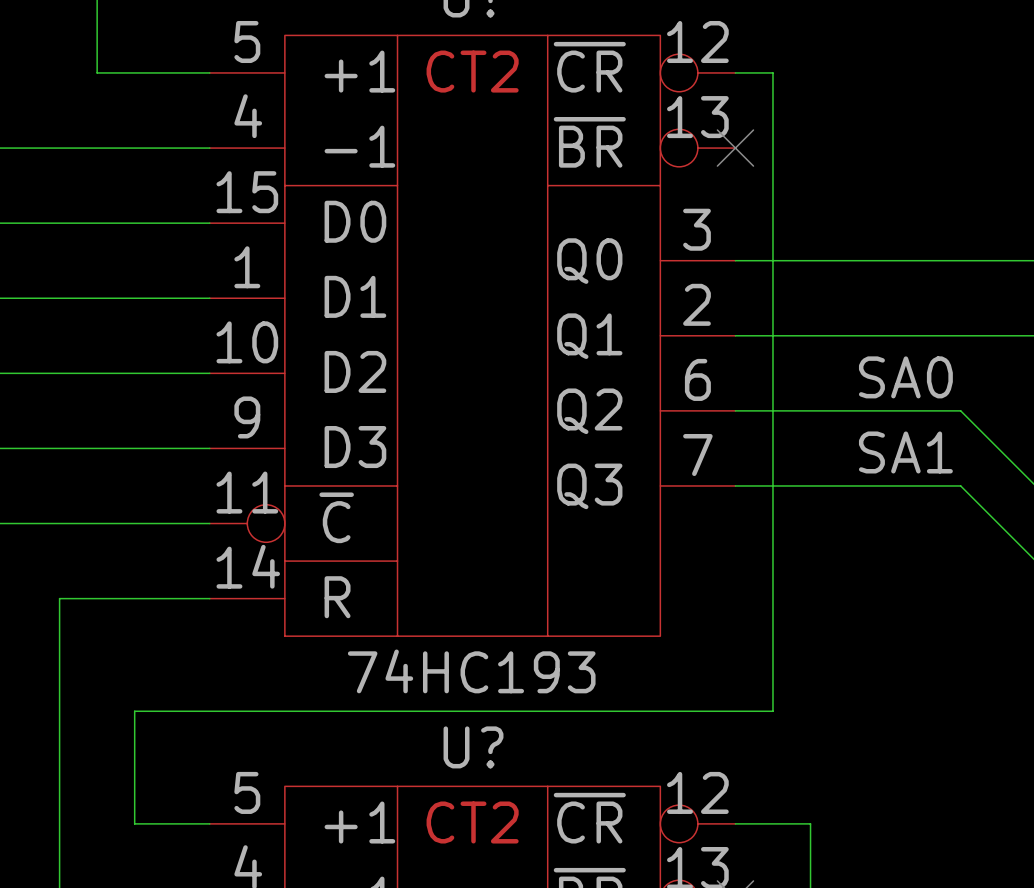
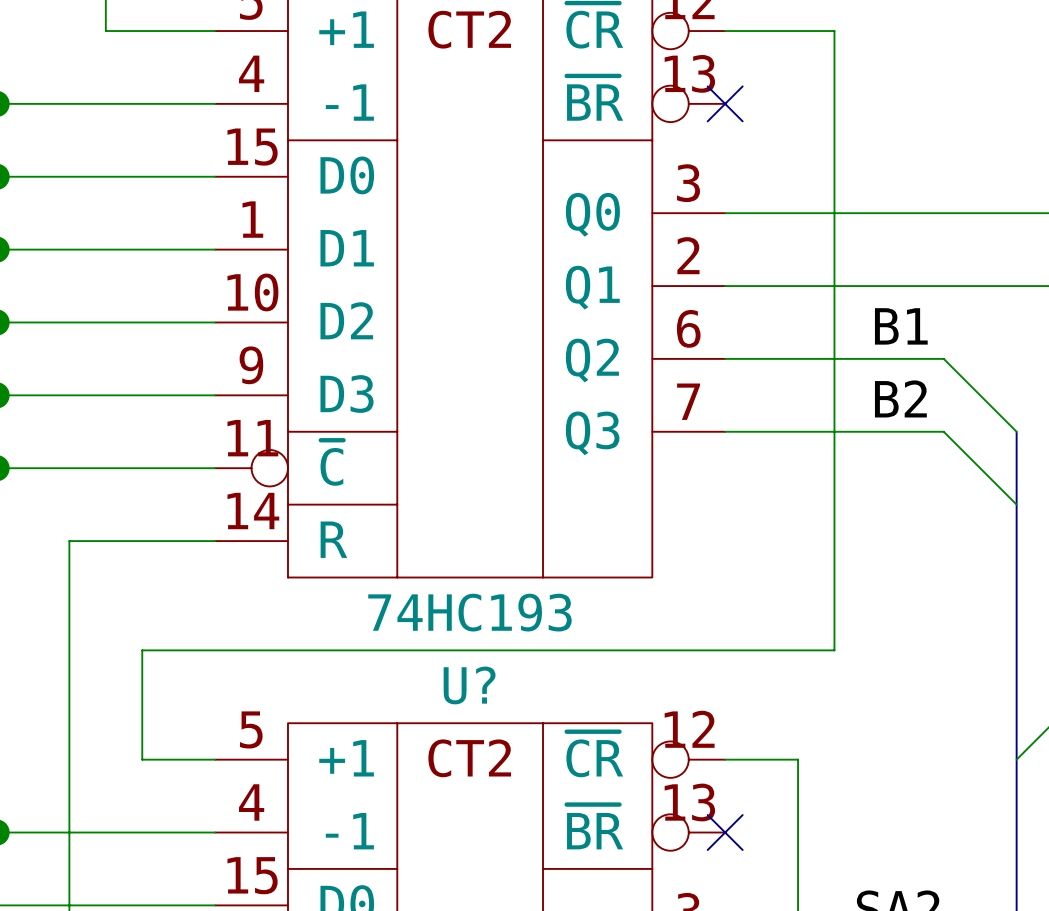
wire: (772, 72) (772, 711) -> (761, 31) (834, 31) (834, 650) (761, 650)
label: SA0 (905, 377) -> none
label: none -> B1 (901, 326)
label: SA1 (905, 452) -> none
label: none -> B2 (900, 398)

